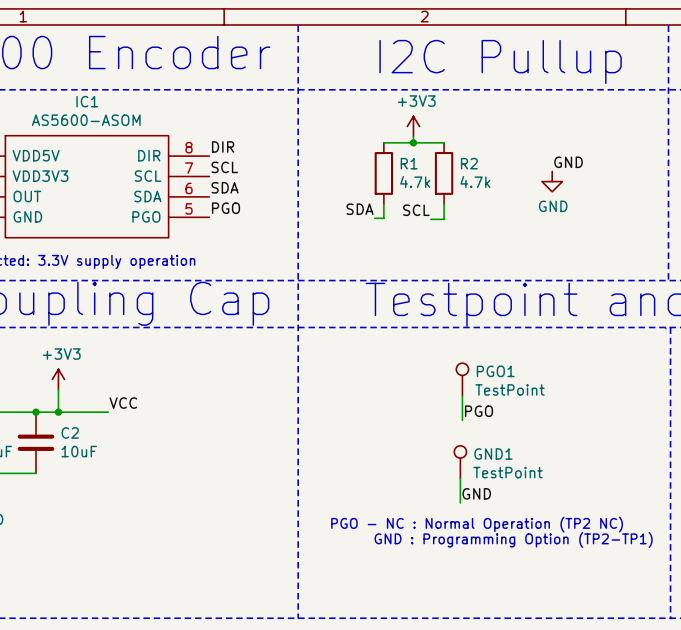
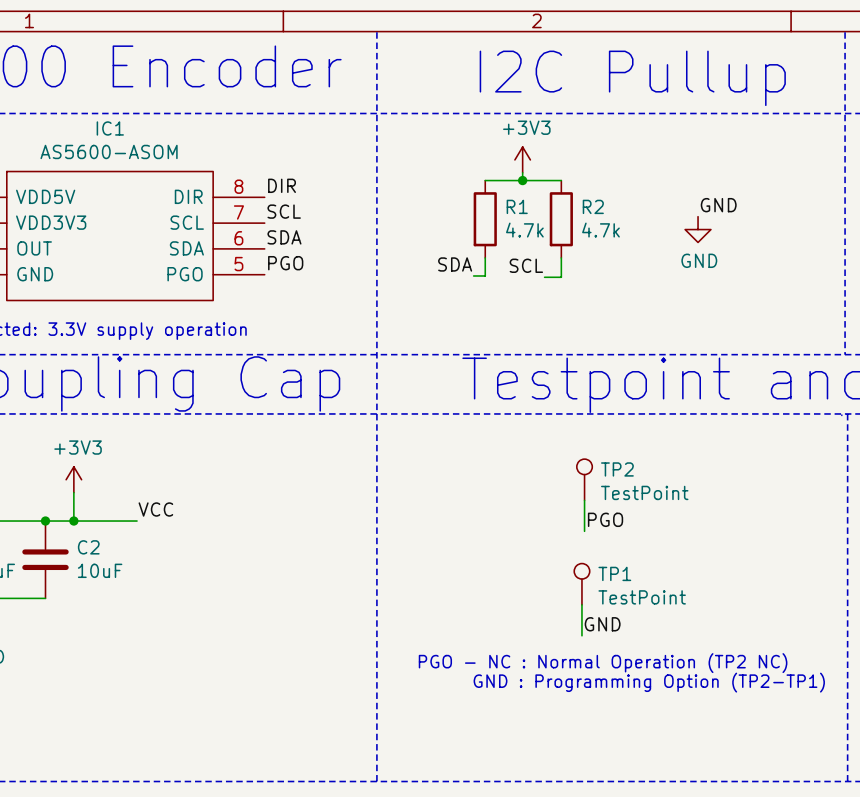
PGO1 name: PGO1 (495, 371) -> TP2 (617, 469)
GND1 name: GND1 (493, 454) -> TP1 (614, 573)

